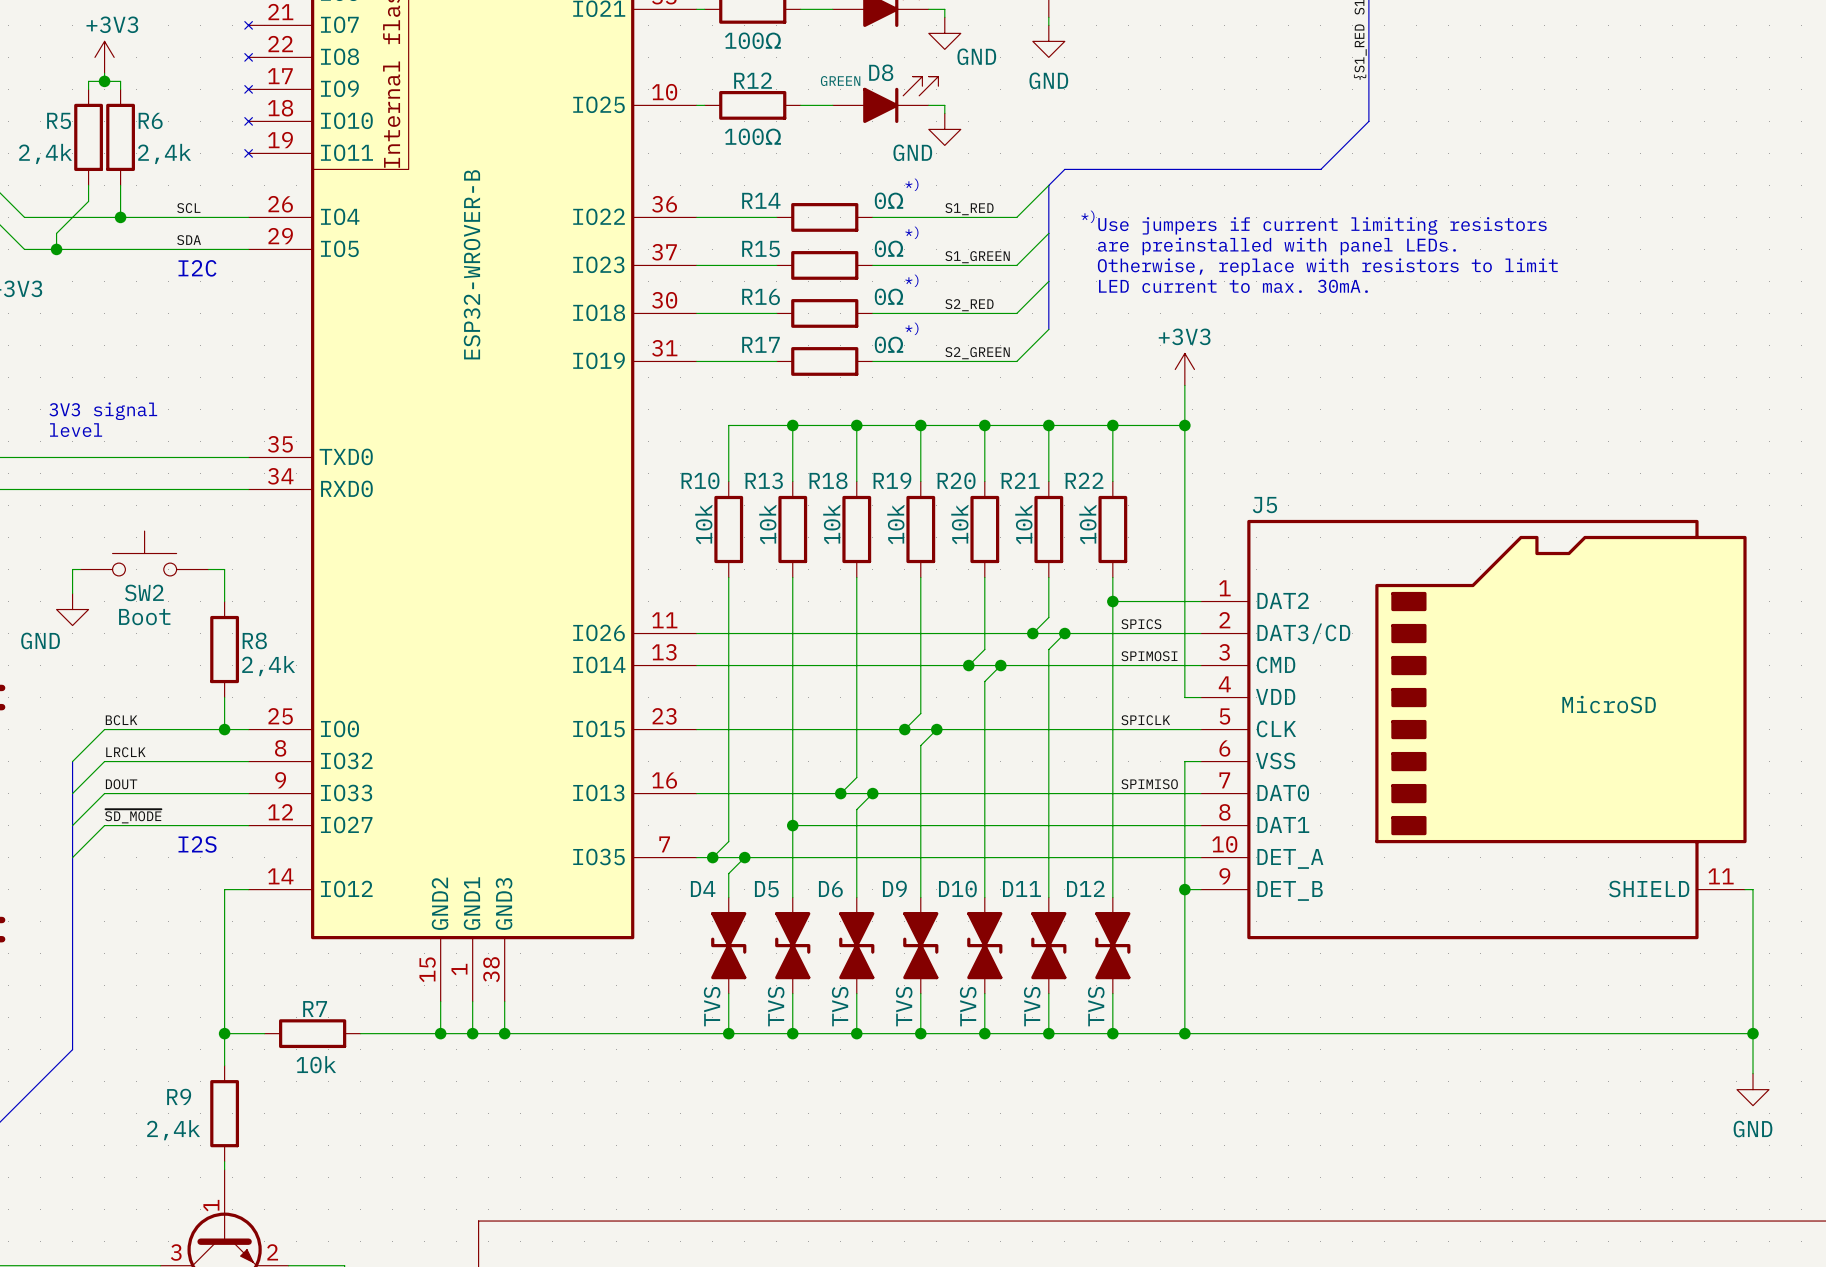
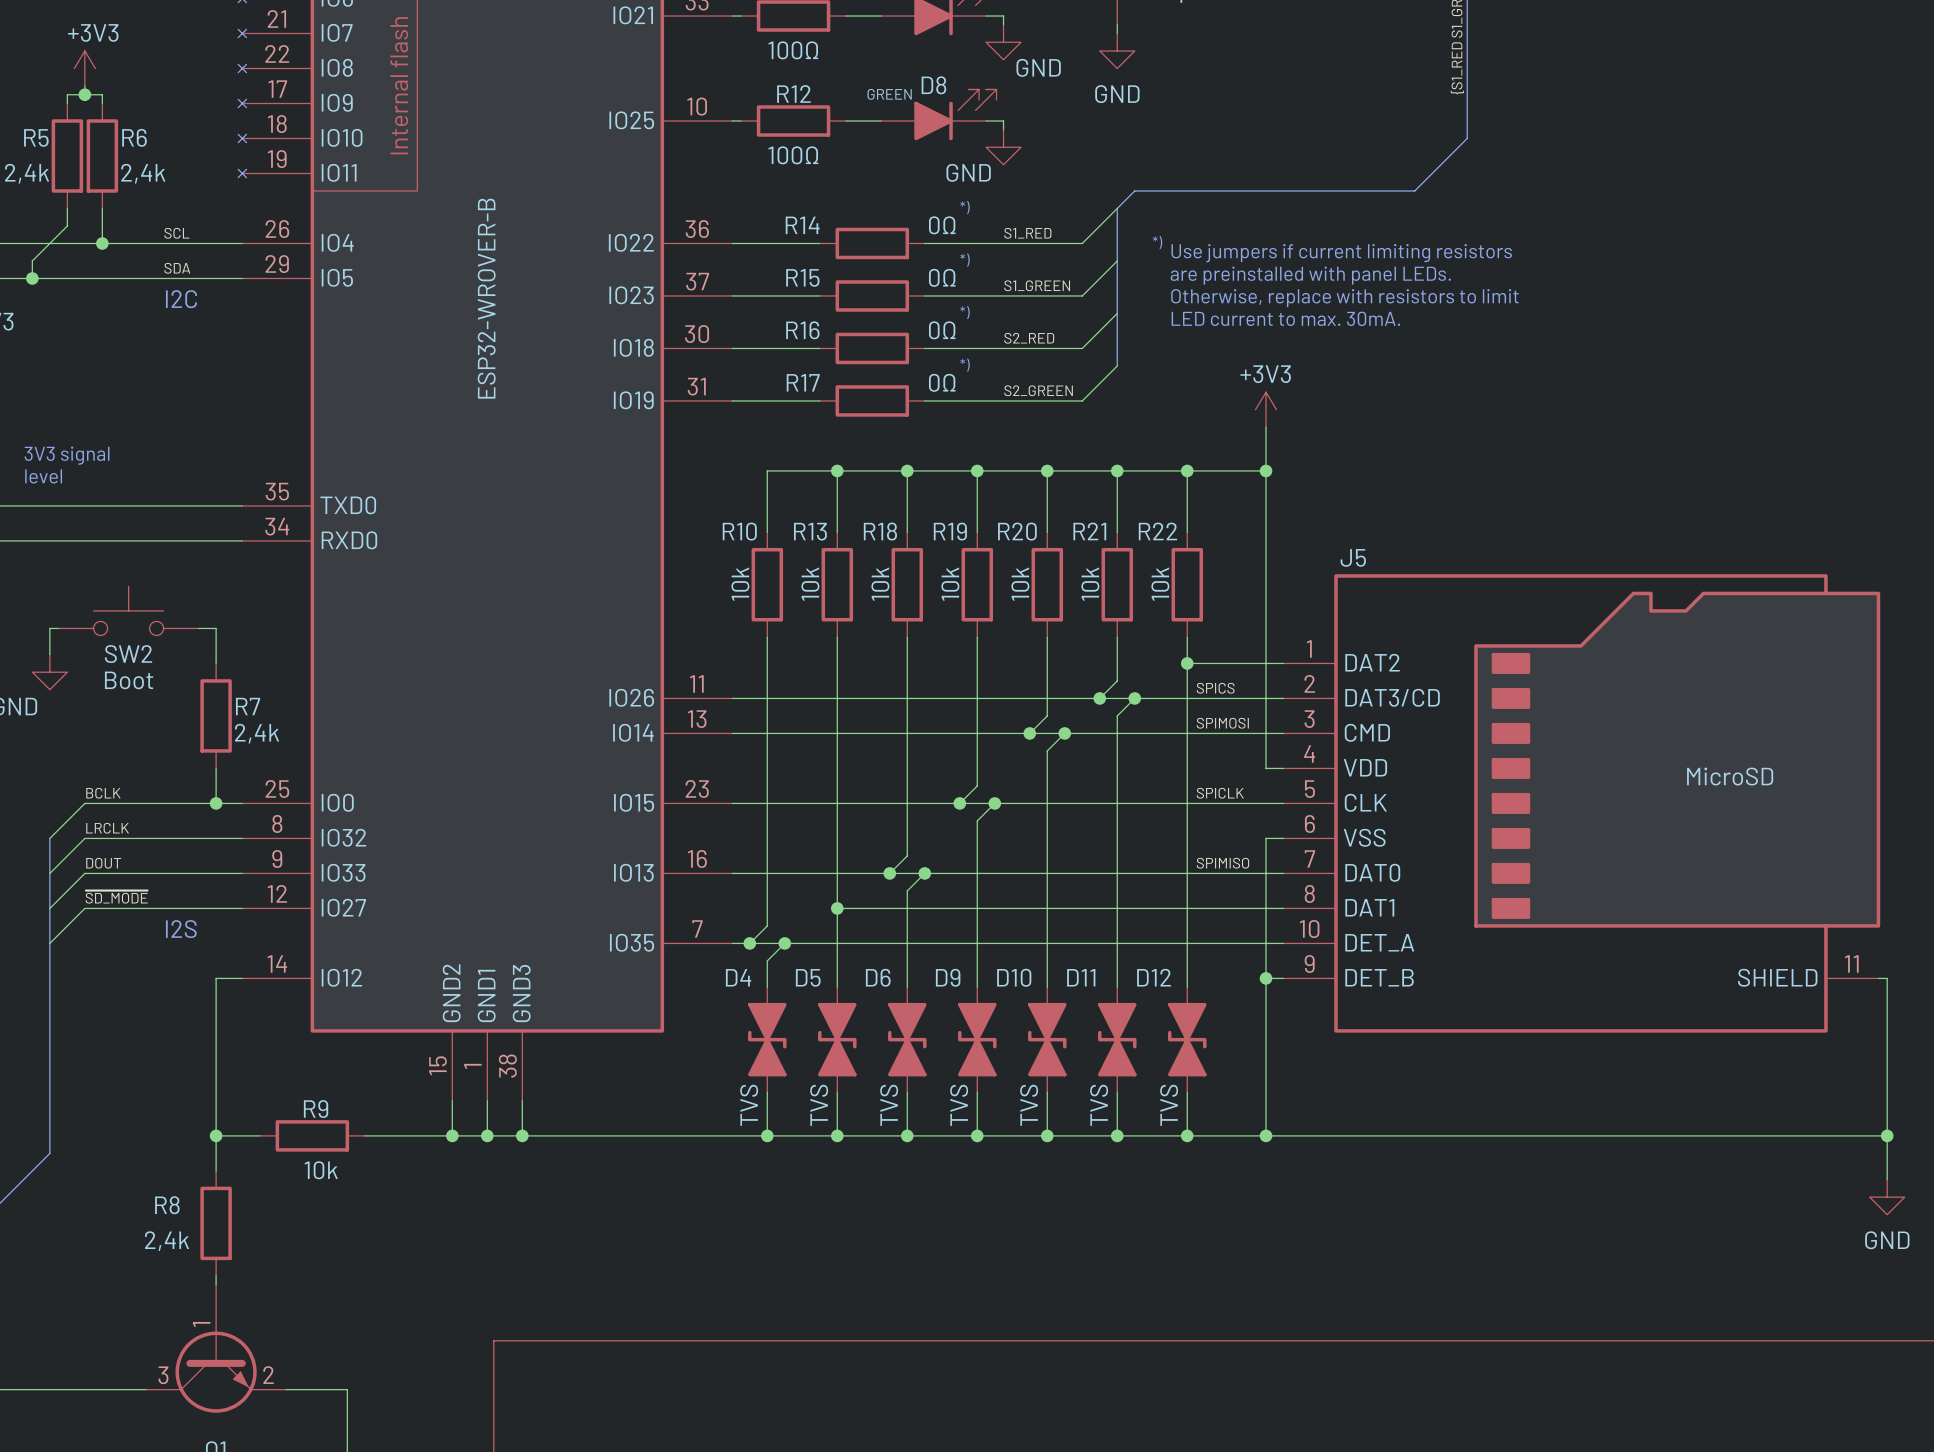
R8 name: R8 (254, 640) -> R7 (248, 706)
R7 name: R7 (315, 1009) -> R9 (316, 1109)
R9 name: R9 (179, 1096) -> R8 (167, 1205)

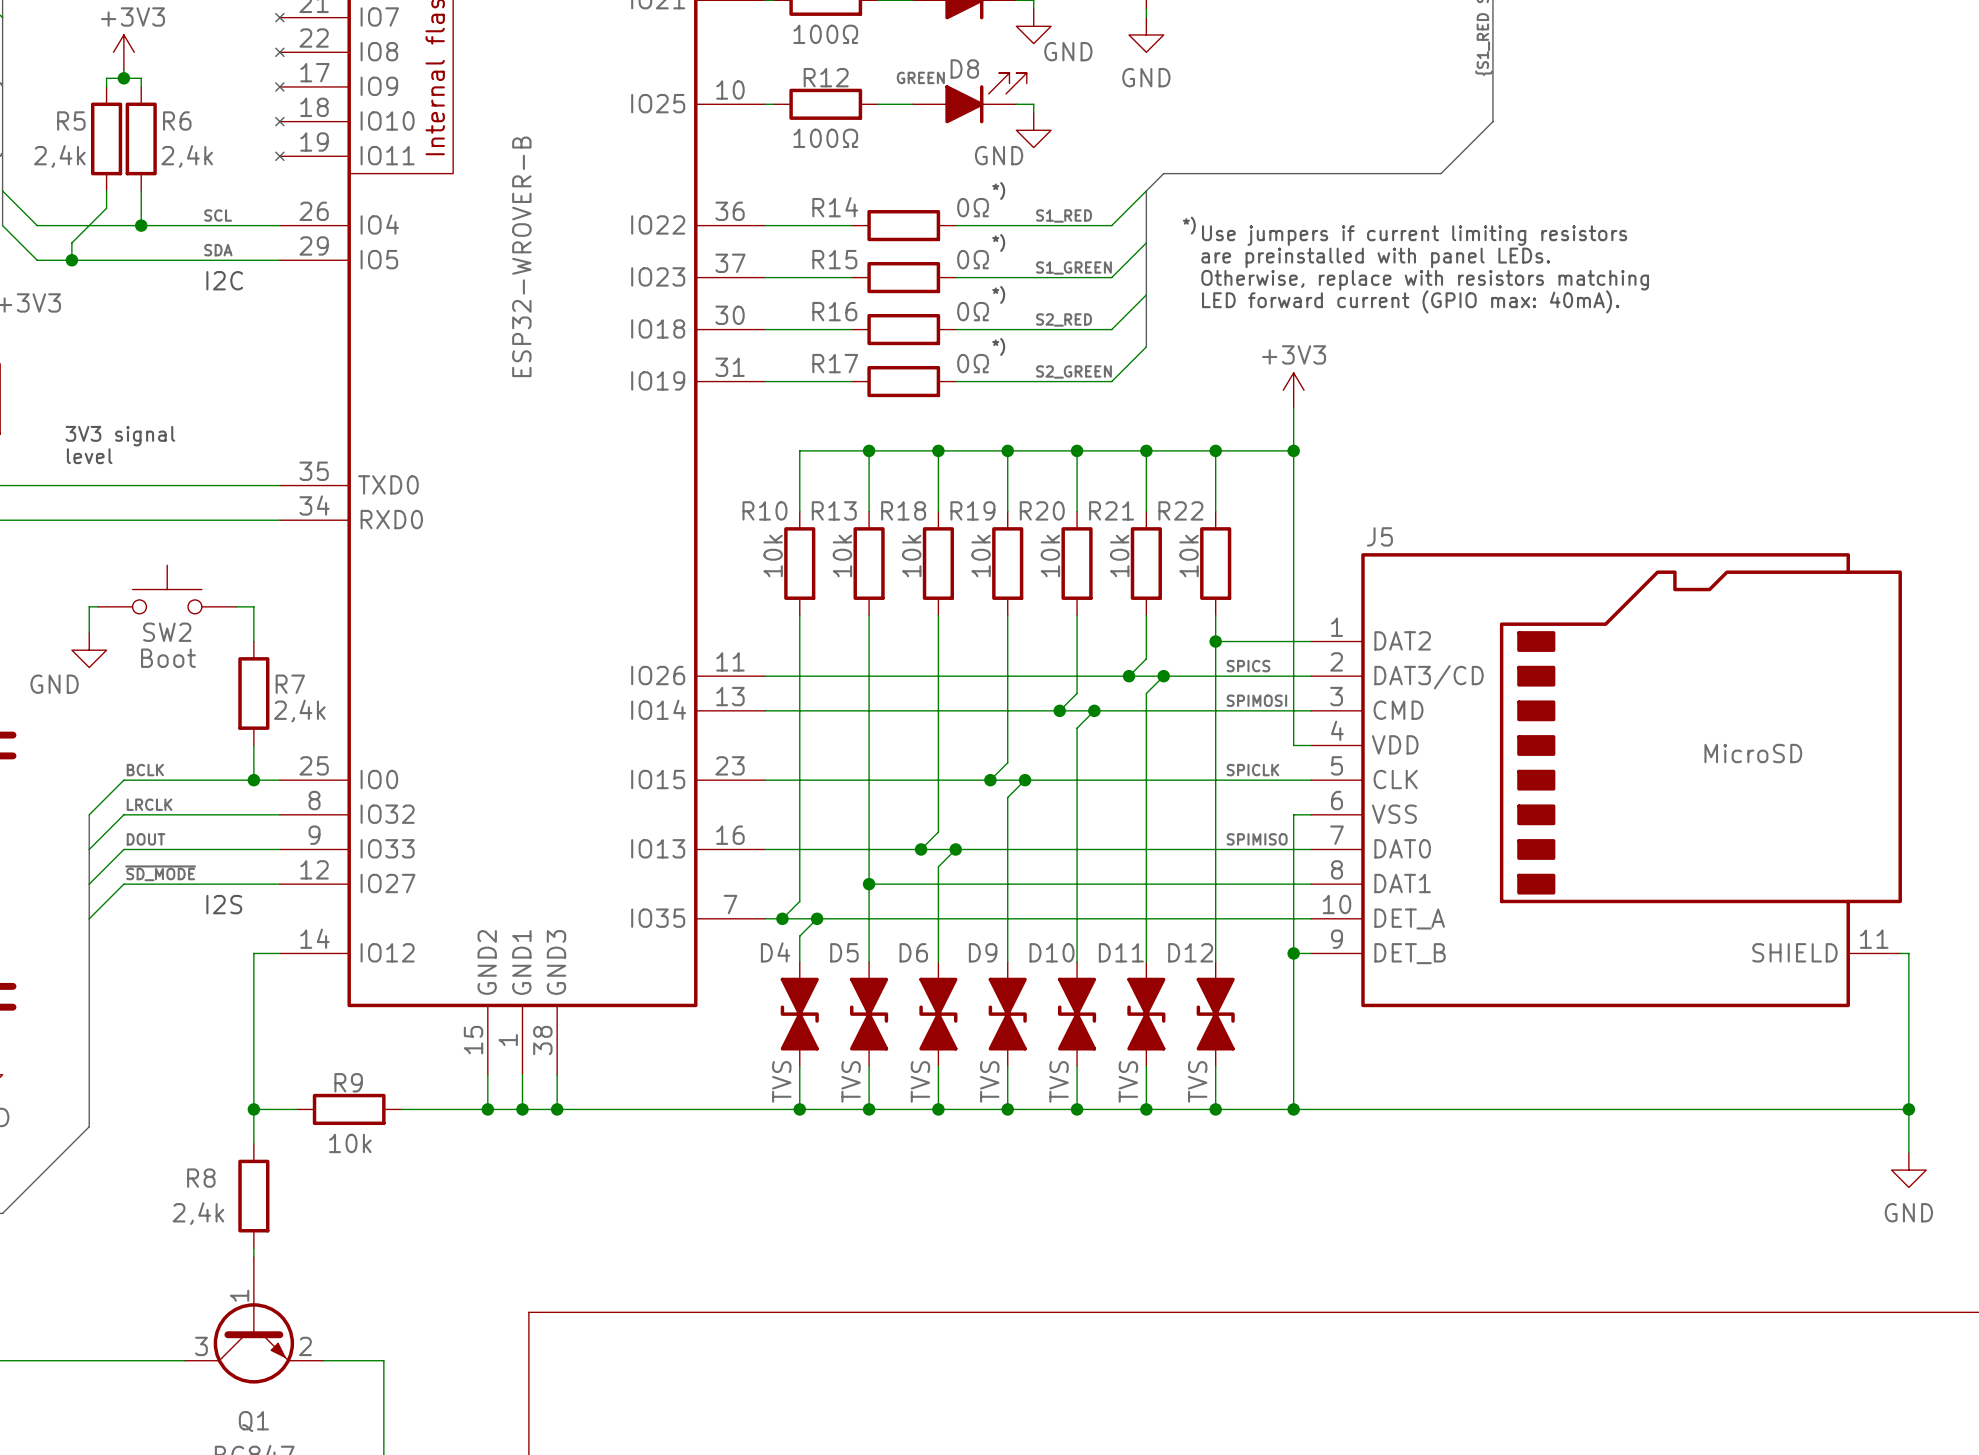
text: Otherwise, replace with resistors to limit (1344, 298) -> Otherwise, replace with resistors matching (1425, 280)
text: LED current to max. 30mA. (1285, 318) -> LED forward current (GPIO max: 40mA). (1410, 301)

